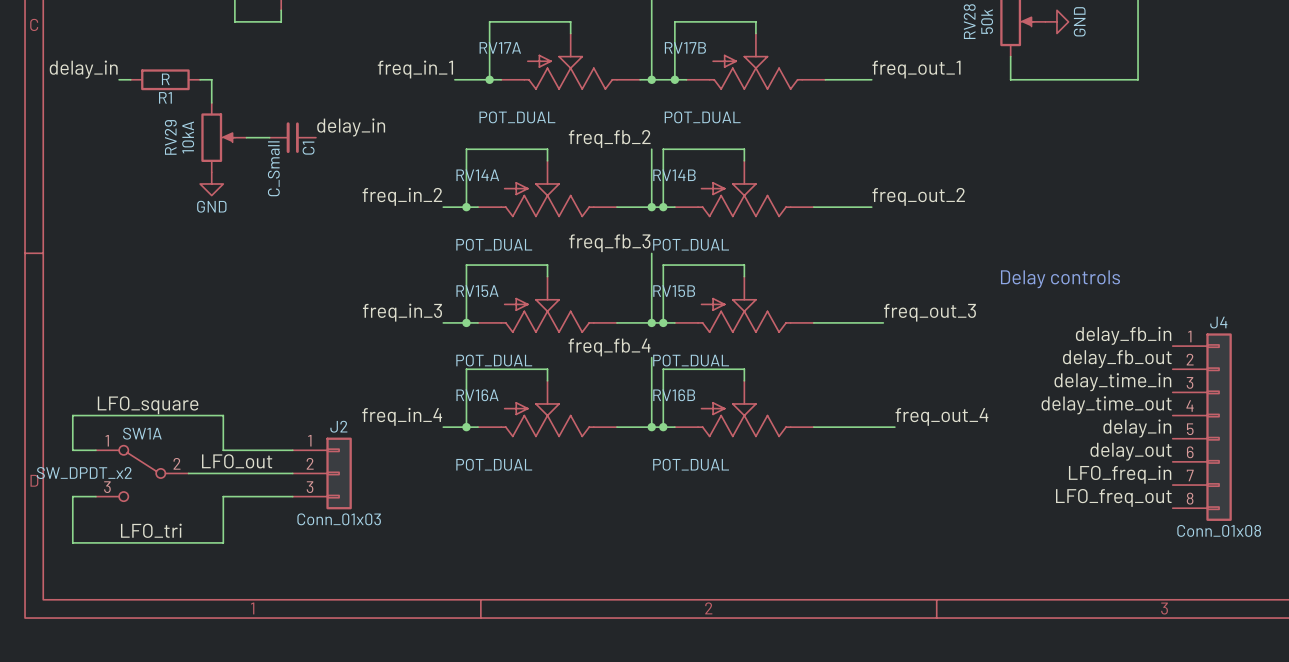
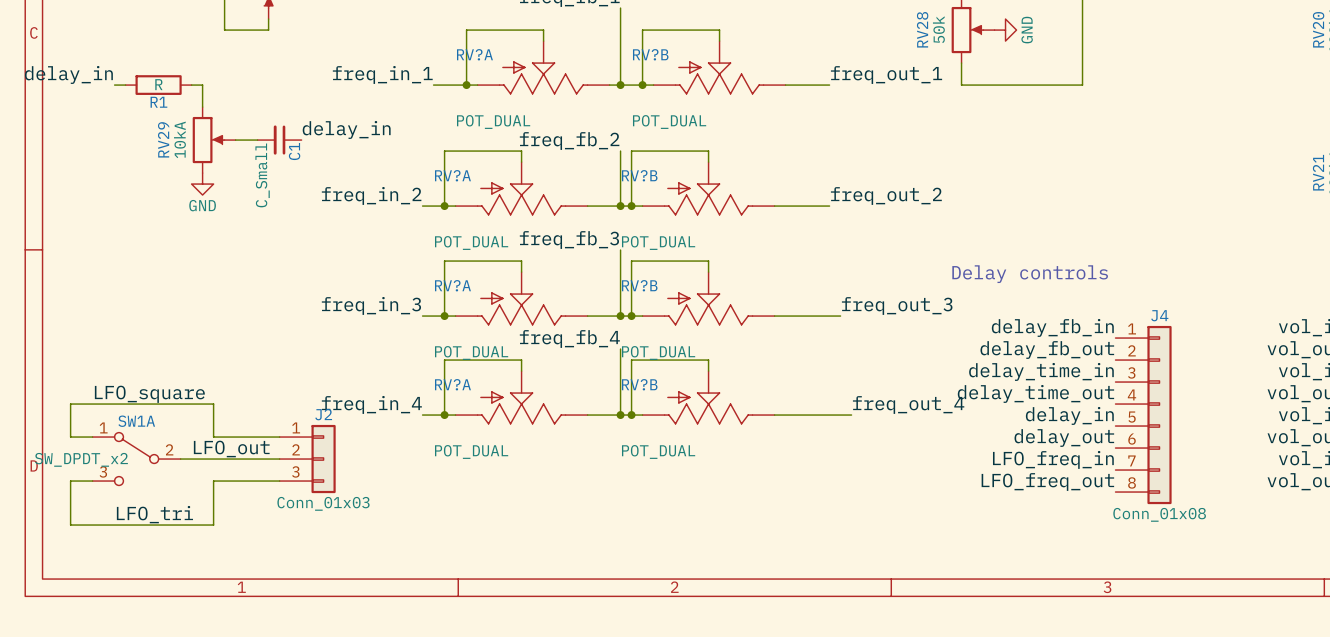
RV17A name: RV17A (500, 47) -> RV?A (474, 54)
RV17B name: RV17B (685, 47) -> RV?B (650, 54)
RV14A name: RV14A (477, 175) -> RV?A (452, 175)
RV14B name: RV14B (674, 175) -> RV?B (639, 175)
RV15A name: RV15A (477, 291) -> RV?A (452, 285)
RV15B name: RV15B (674, 291) -> RV?B (639, 285)
RV16A name: RV16A (477, 395) -> RV?A (452, 384)
RV16B name: RV16B (674, 395) -> RV?B (639, 384)

